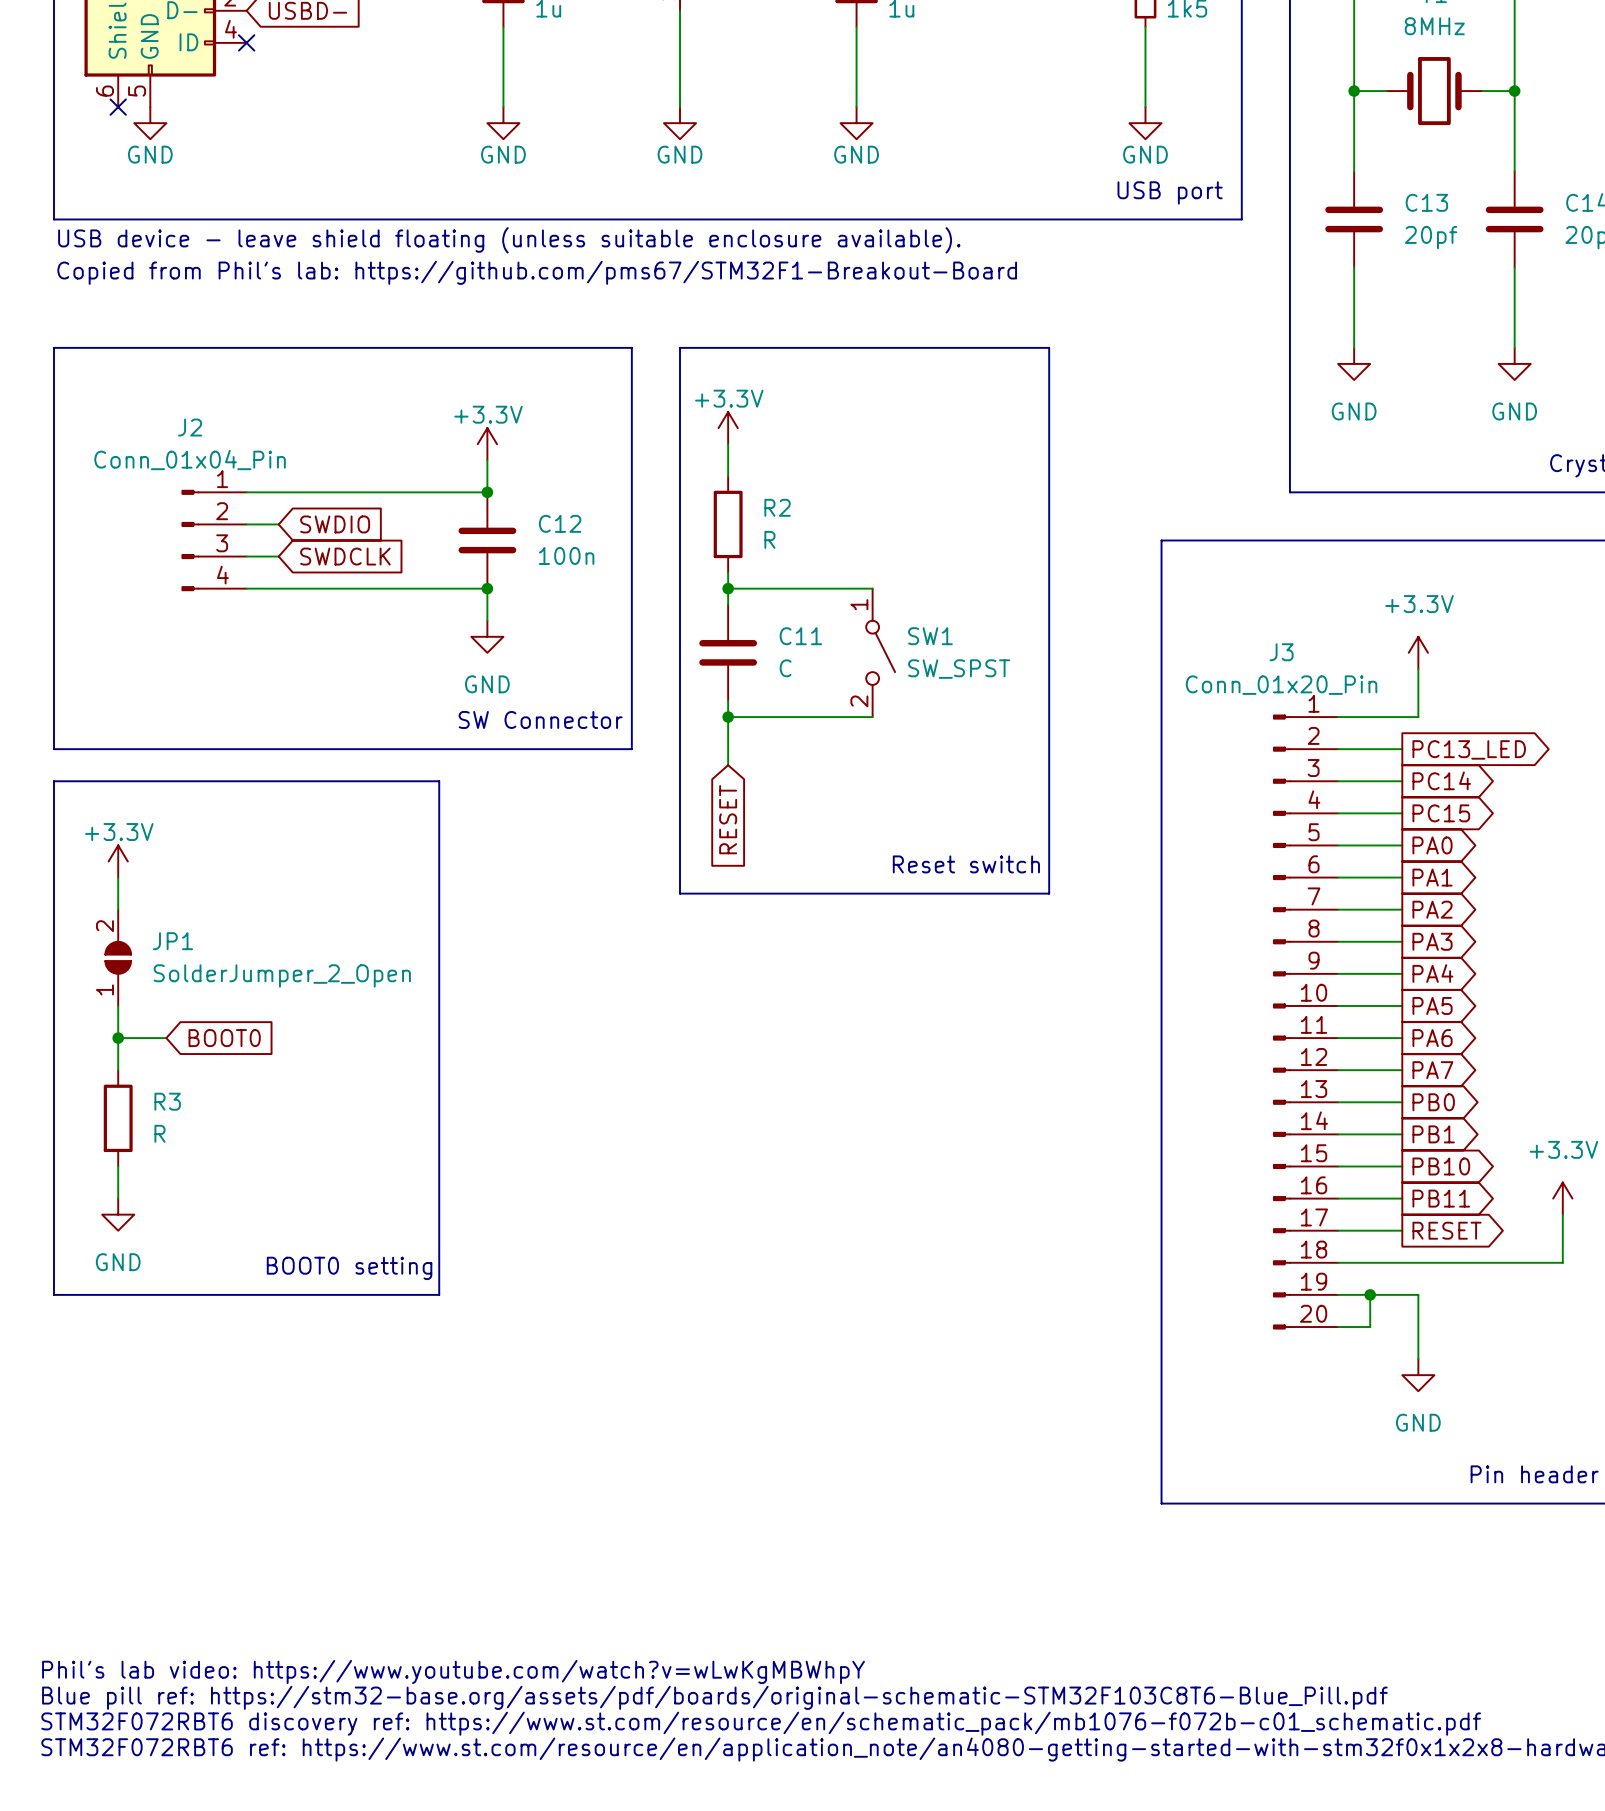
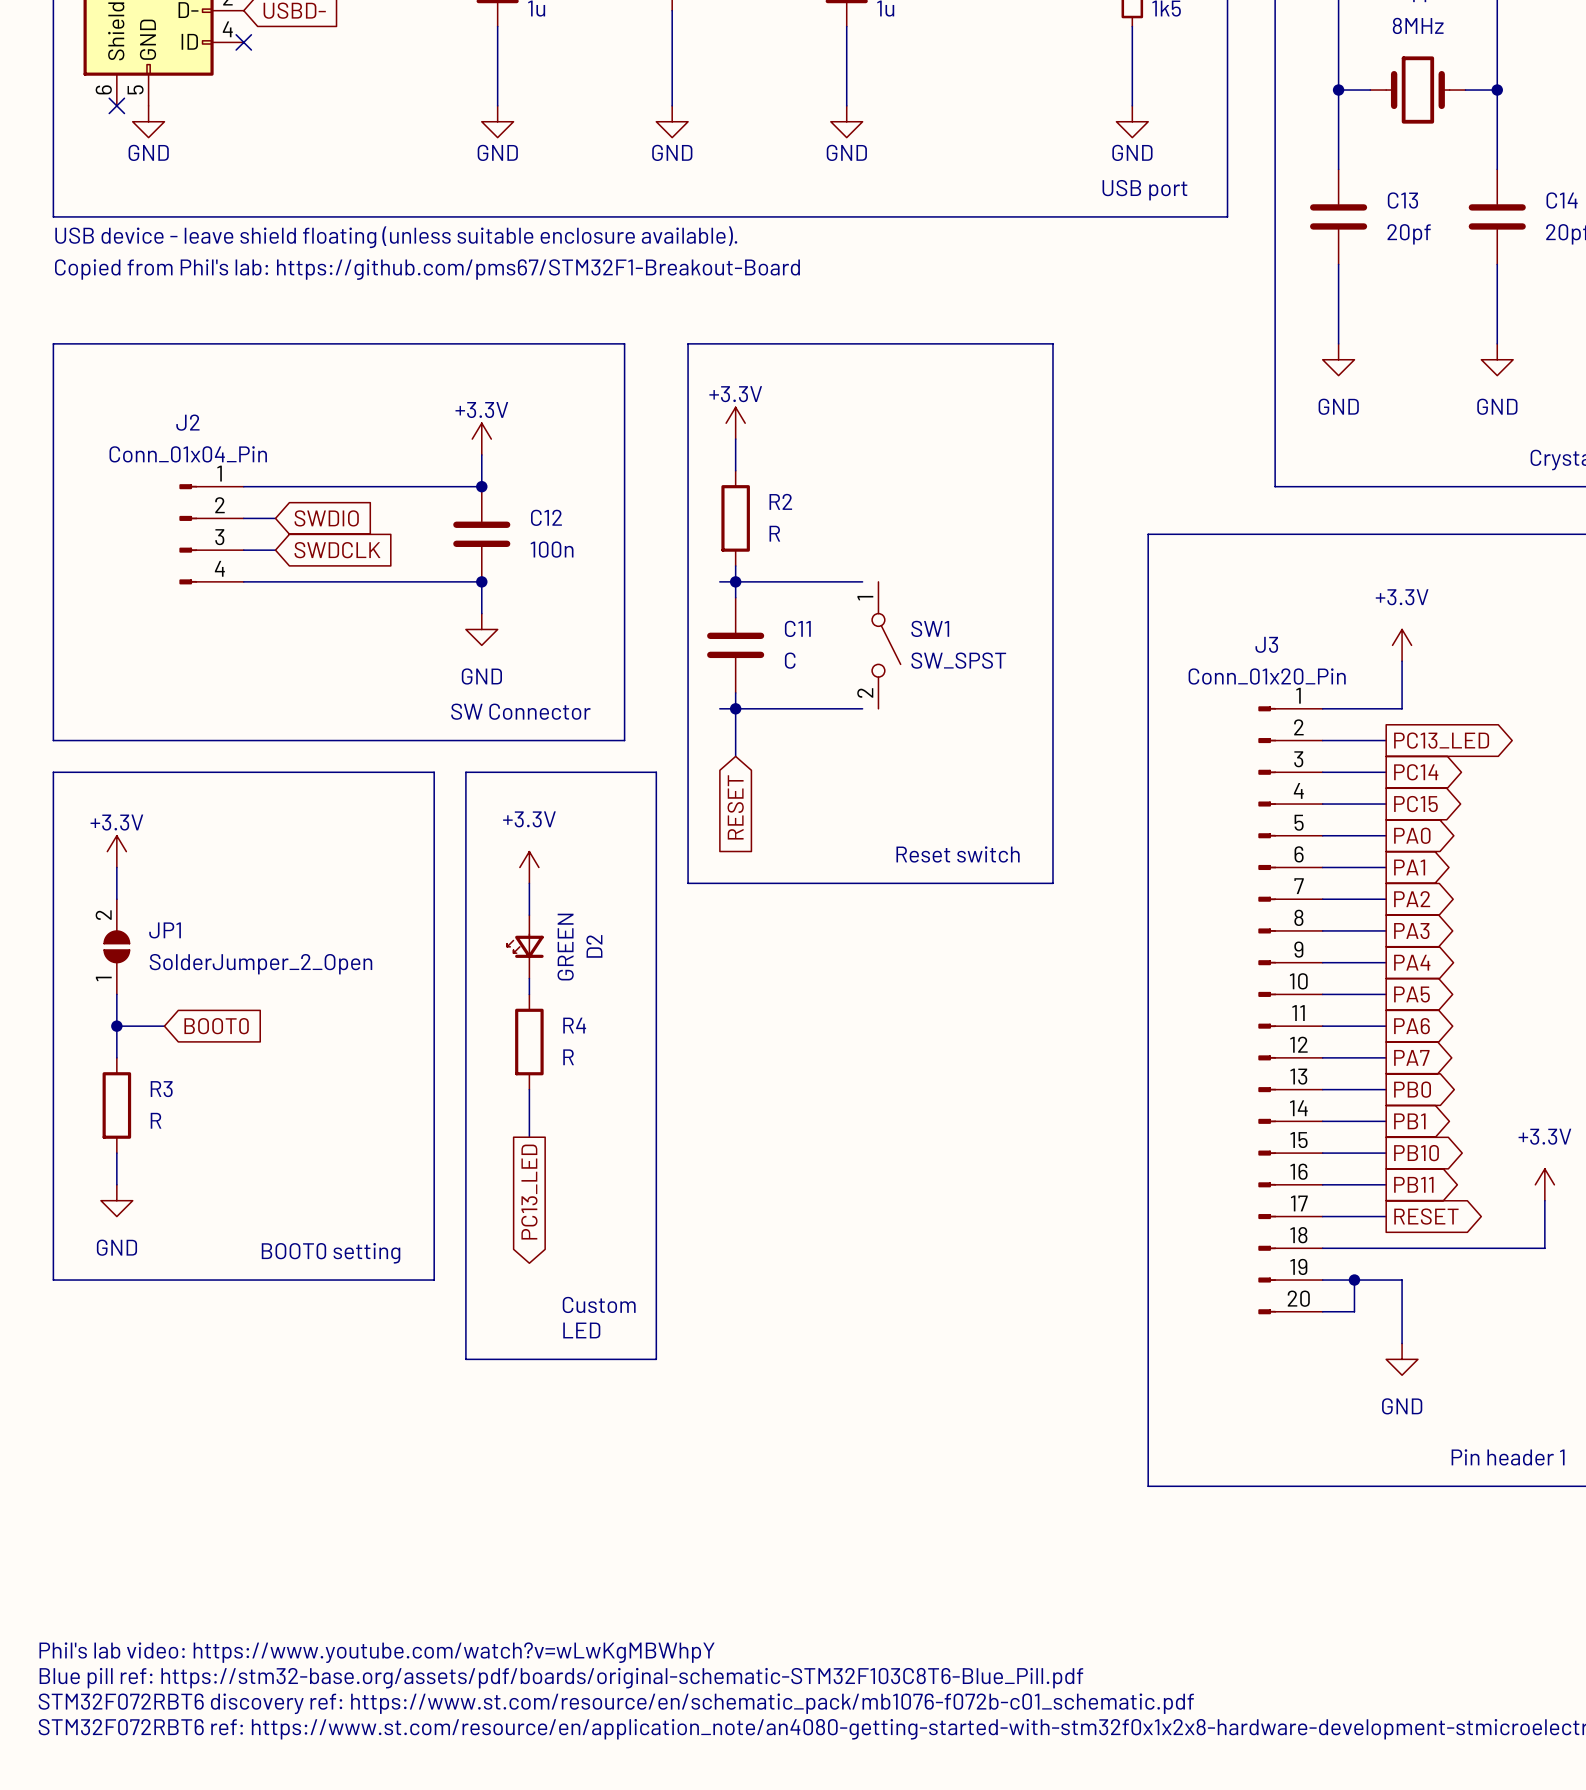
line: (696, 347) (680, 347) (680, 893) (696, 893) -> (688, 343) (688, 883)
line: (1049, 347) (1049, 893) -> (1037, 343) (1052, 343) (1052, 883) (1037, 883)
power symbol position: +3.3V (728, 428) -> +3.3V (735, 423)
wire: (728, 444) (728, 476) -> (735, 439) (735, 470)
R2 position: (728, 524) -> (735, 518)
wire: (728, 572) (728, 604) -> (735, 566) (735, 597)
junction position: (728, 588) -> (735, 581)
C11 position: (728, 652) -> (735, 645)
SW1 position: (880, 652) -> (886, 645)
wire: (728, 701) (728, 765) -> (735, 692) (735, 756)
junction position: (728, 717) -> (735, 708)
line: none -> (465, 772) (656, 772) (656, 1359) (465, 1359) (465, 772)
global label position: RESET (728, 819) -> RESET (735, 807)
text position: Reset switch (966, 864) -> Reset switch (958, 854)
power symbol: none -> +3.3V (529, 867)
wire: none -> (529, 883) (529, 915)
D2: none -> GREEN (525, 946)
wire: none -> (529, 978) (529, 994)
R4: none -> R (529, 1042)
wire: none -> (529, 1089) (529, 1137)
global label: none -> PC13_LED (529, 1192)
text: none -> Custom (599, 1304)
text: none -> LED (581, 1330)

